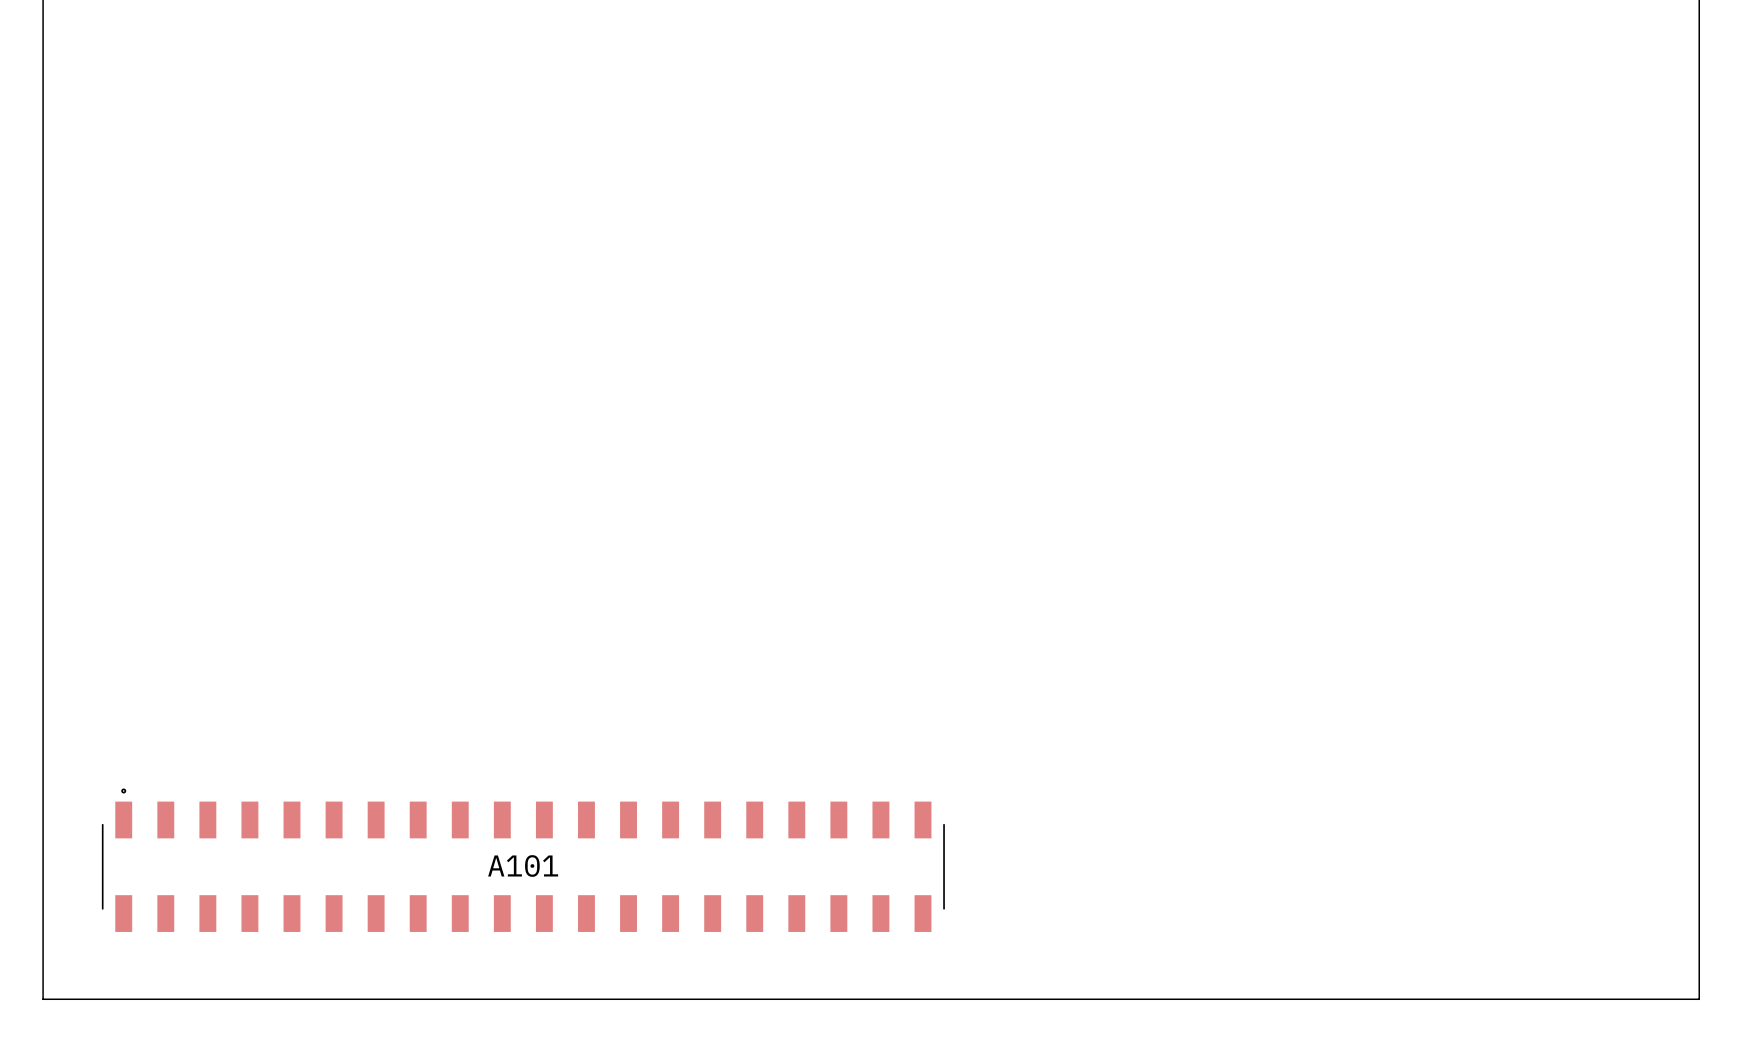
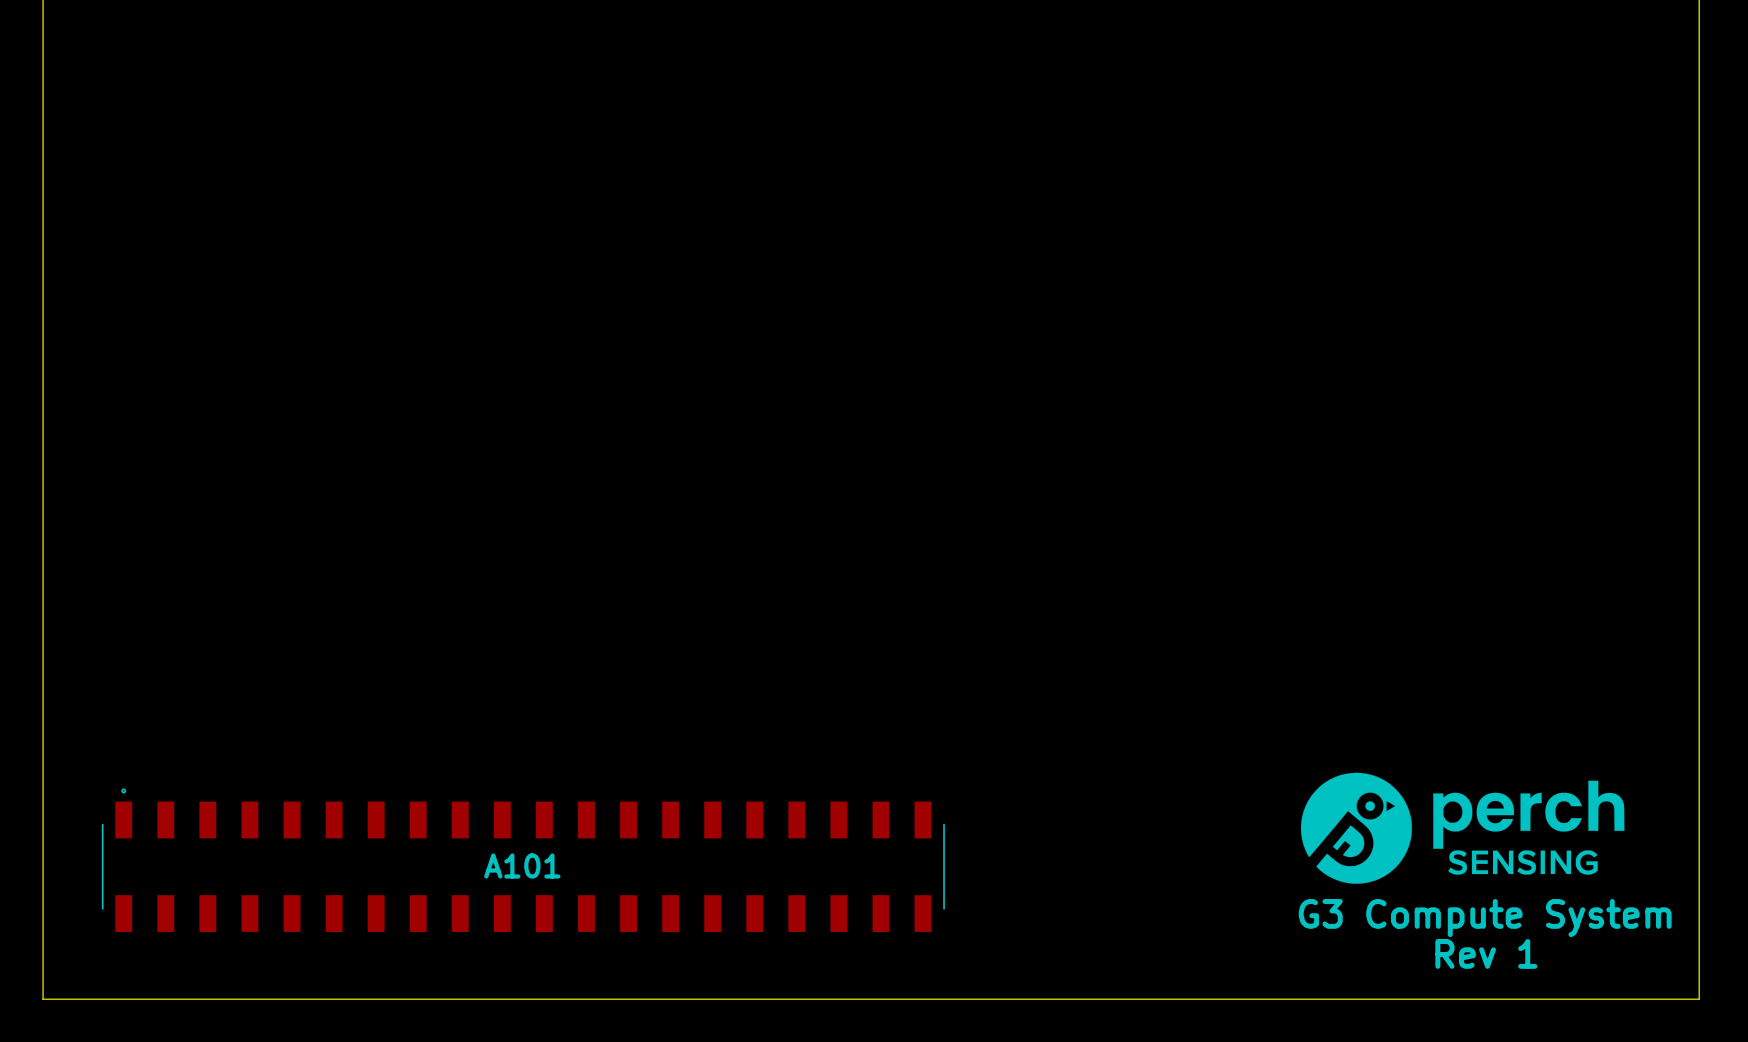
drawing: none -> [1300, 772, 1625, 884]
text: none -> G3 Compute System (1485, 918)
text: none -> Rev 1 (1486, 953)

